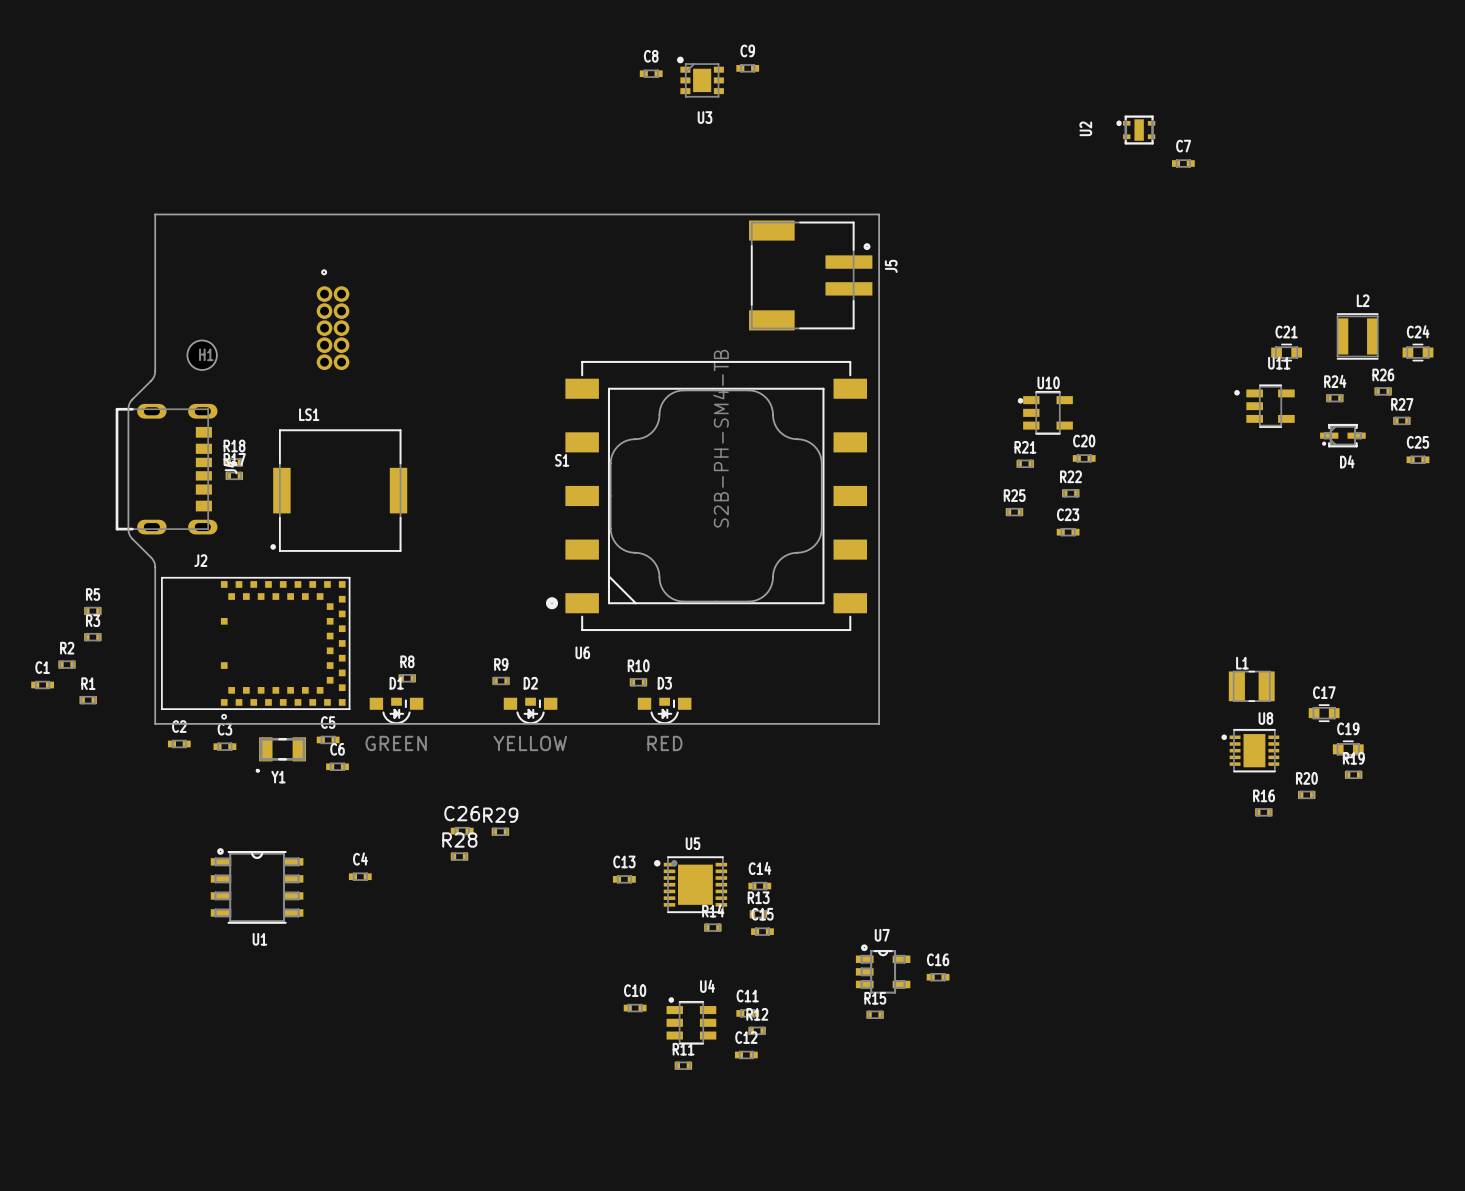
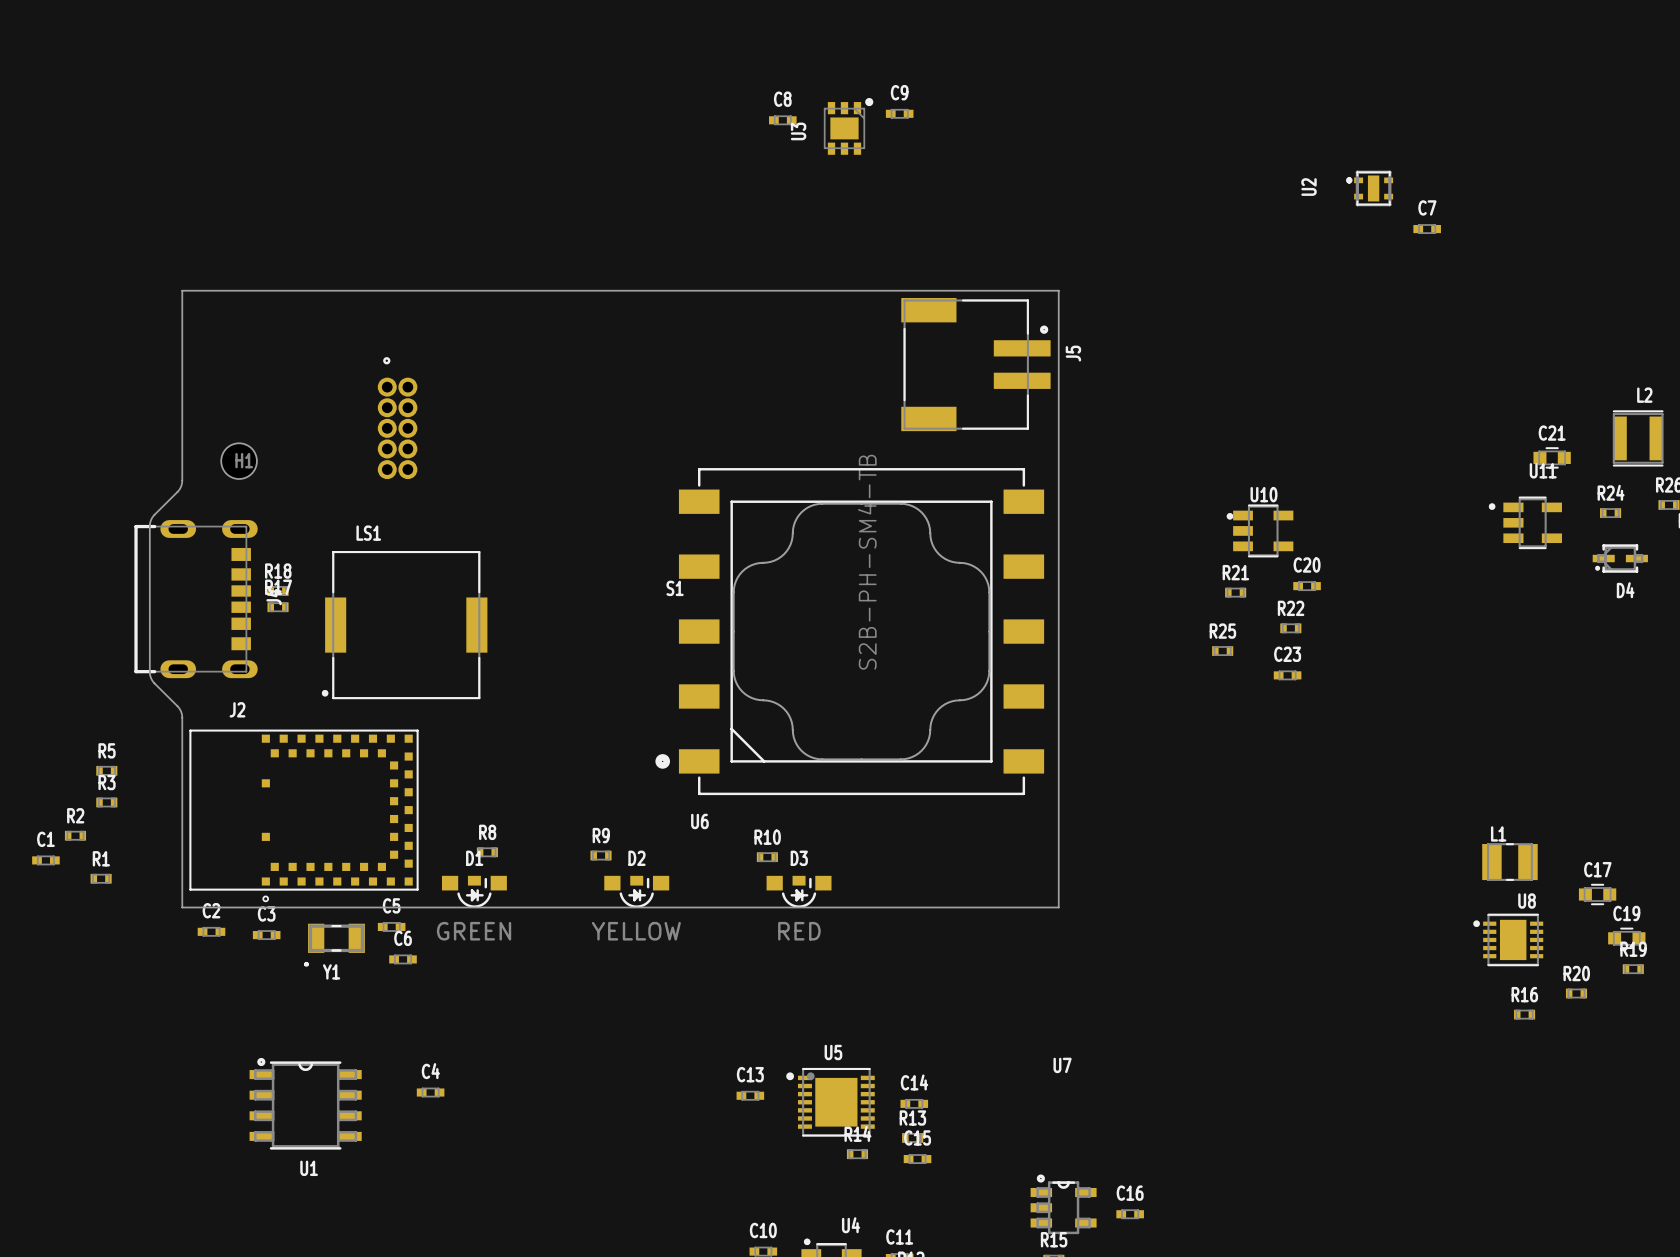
U3 rotation: 0° (700, 77) -> 90° clockwise (848, 126)
C26: (462, 831) -> none
R29: (500, 831) -> none
R28: (459, 856) -> none
U7 name position: U7 (882, 935) -> U7 (1062, 1065)

